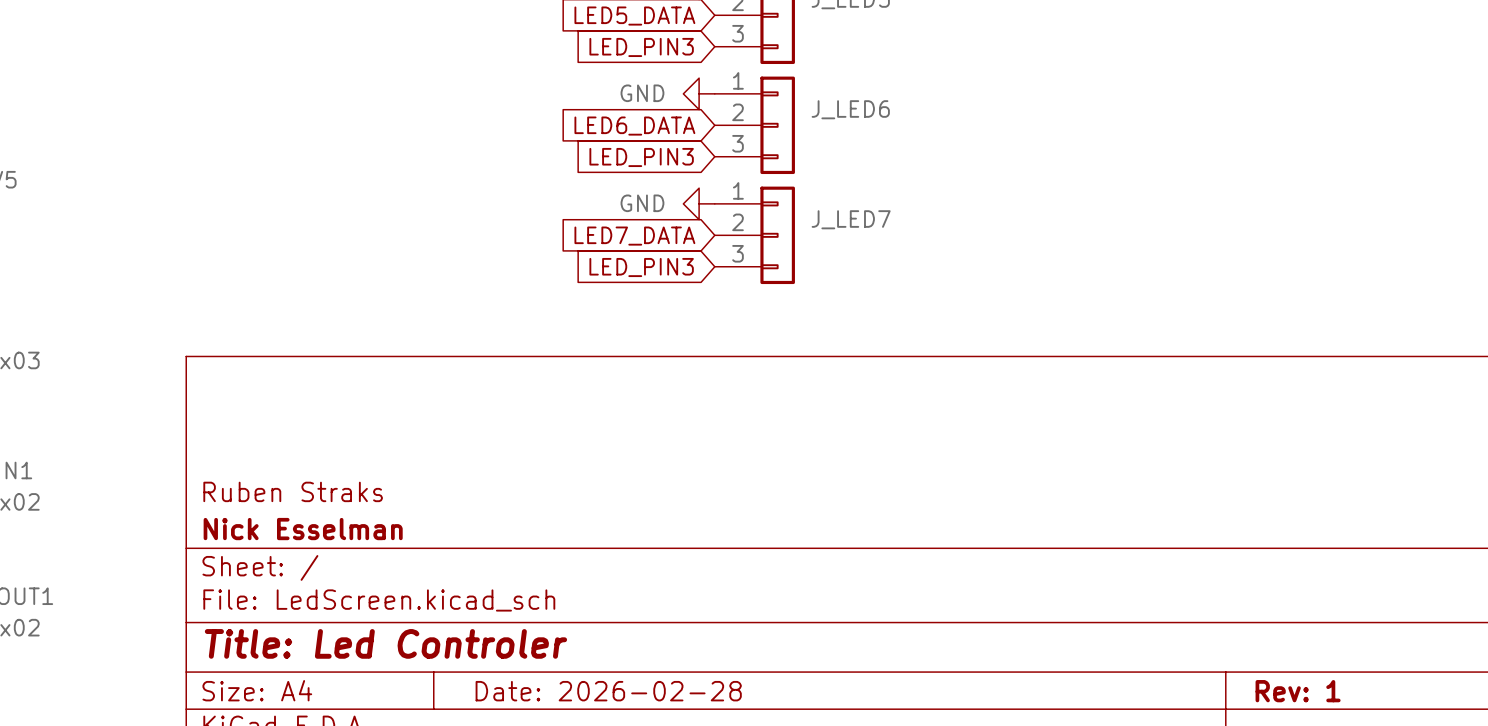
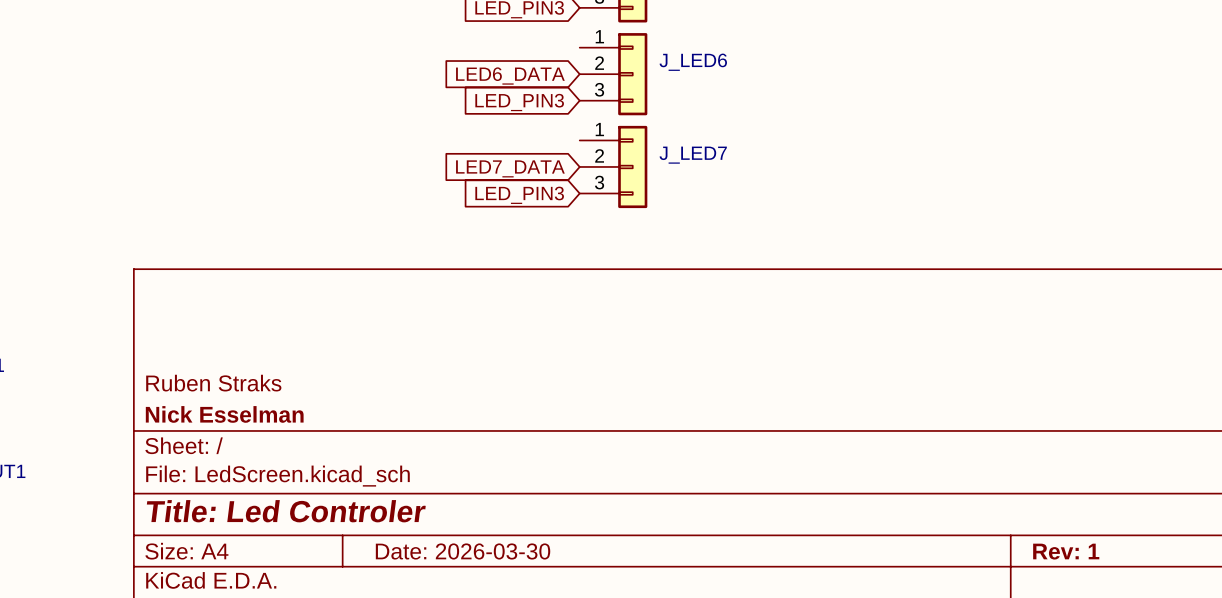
power symbol: GND (699, 93) -> none
power symbol: GND (699, 203) -> none
title block: Date: 2026-02-28 (608, 691) -> Date: 2026-03-30 (463, 551)

